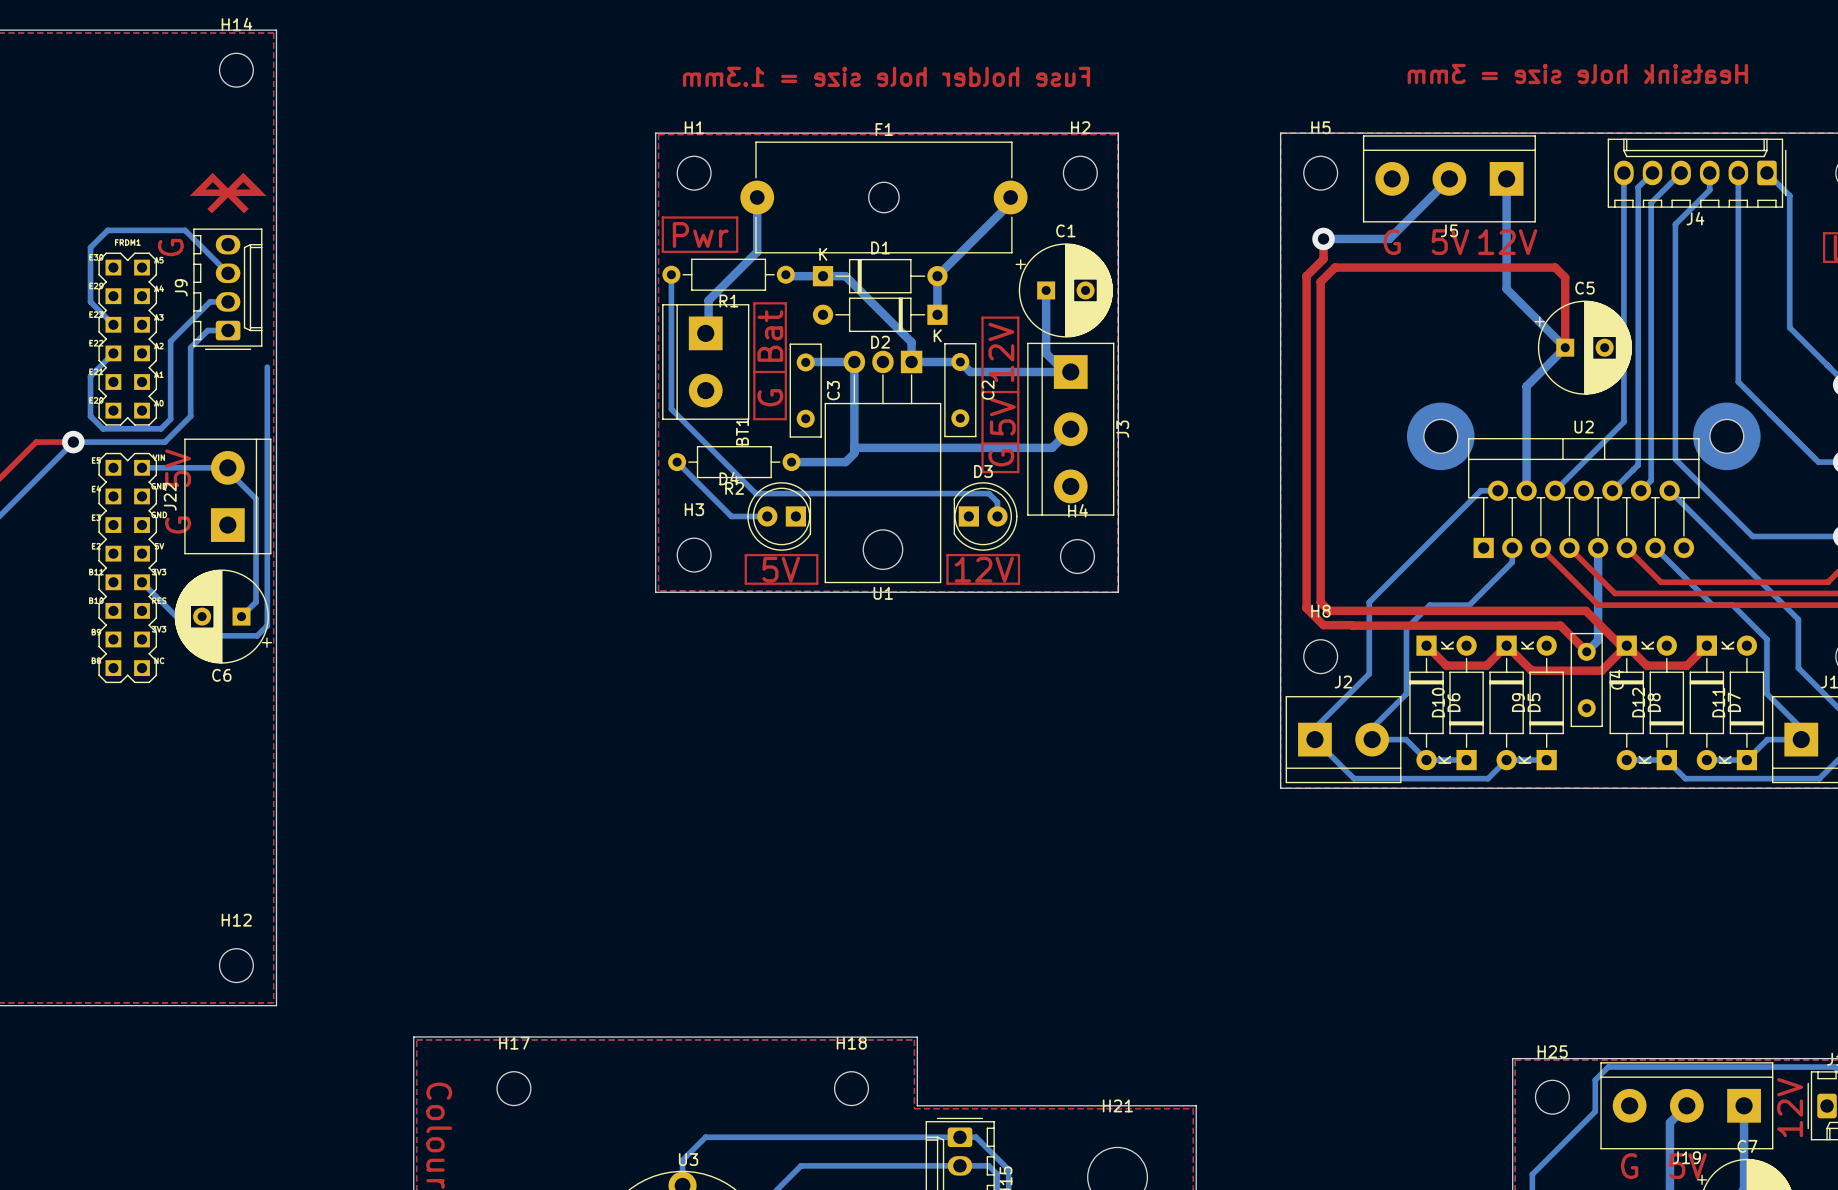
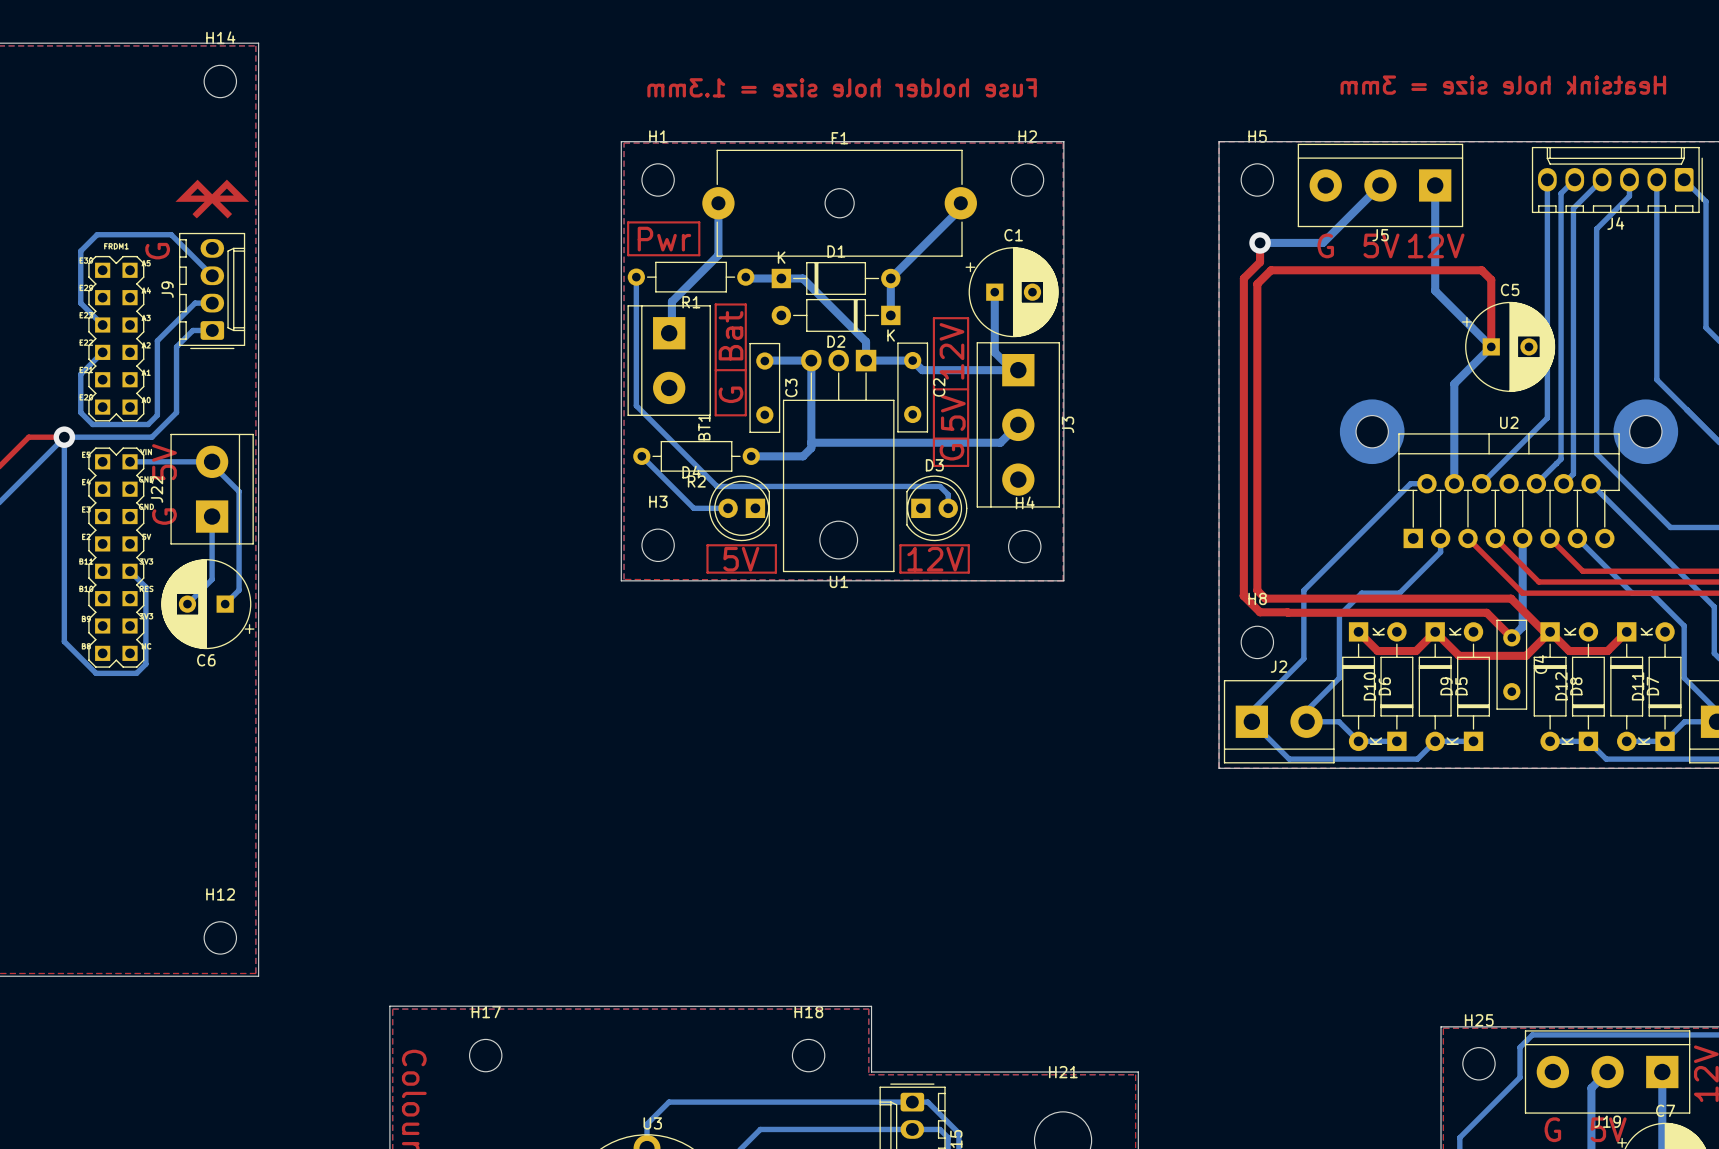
bottom track: (267, 367) (267, 625) (257, 635) (195, 635) (158, 598) -> (64, 437) (64, 641) (96, 673) (136, 673) (145, 664) (145, 587)
bottom track: none -> (212, 516) (212, 579) (187, 604)

